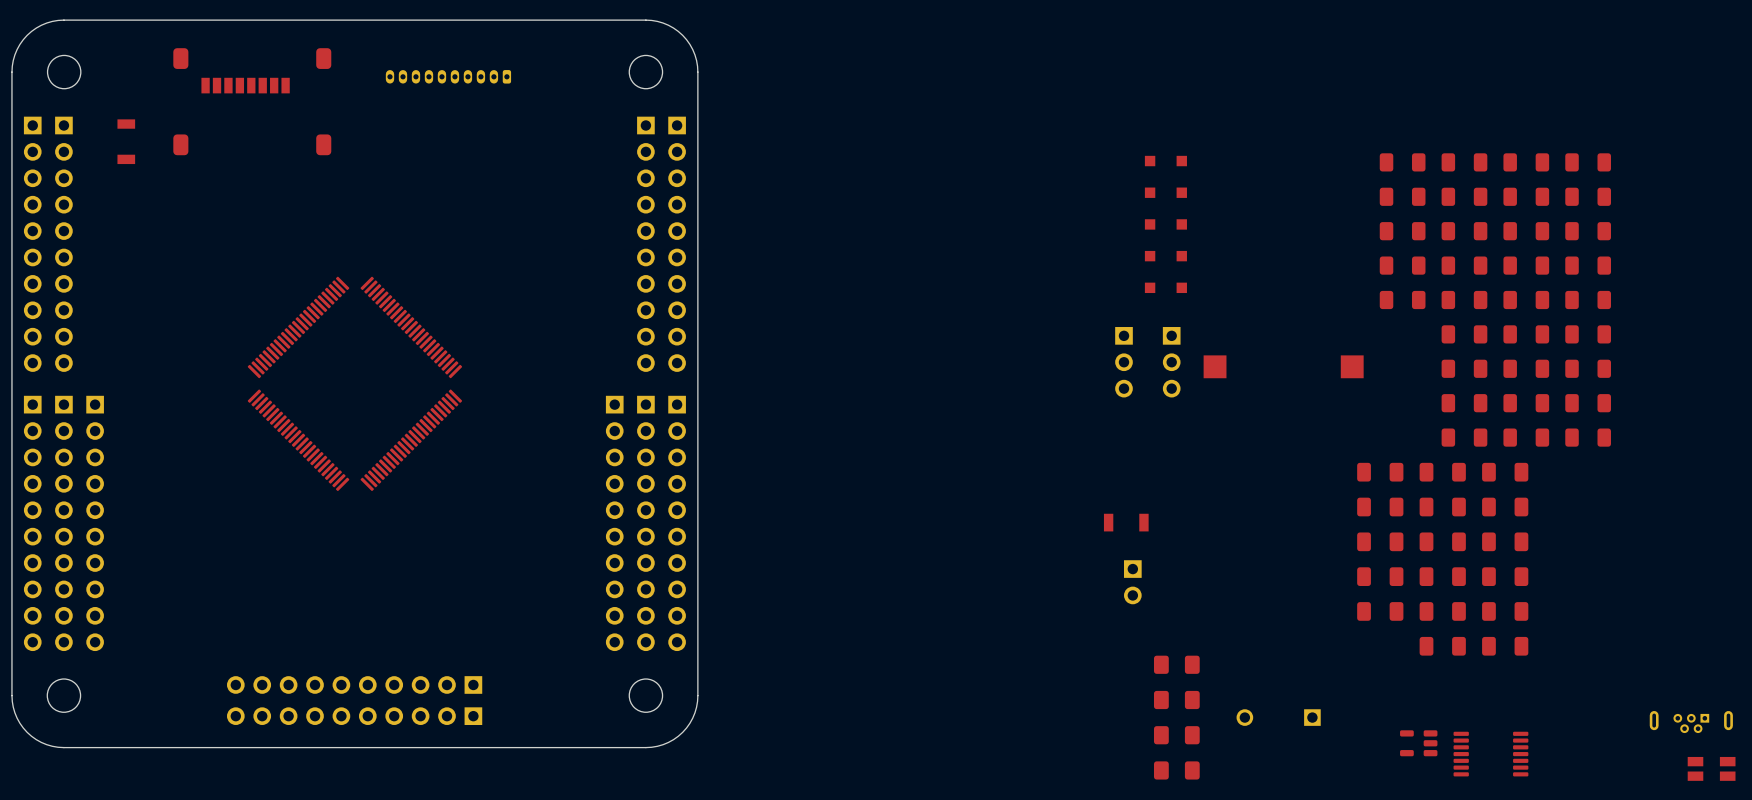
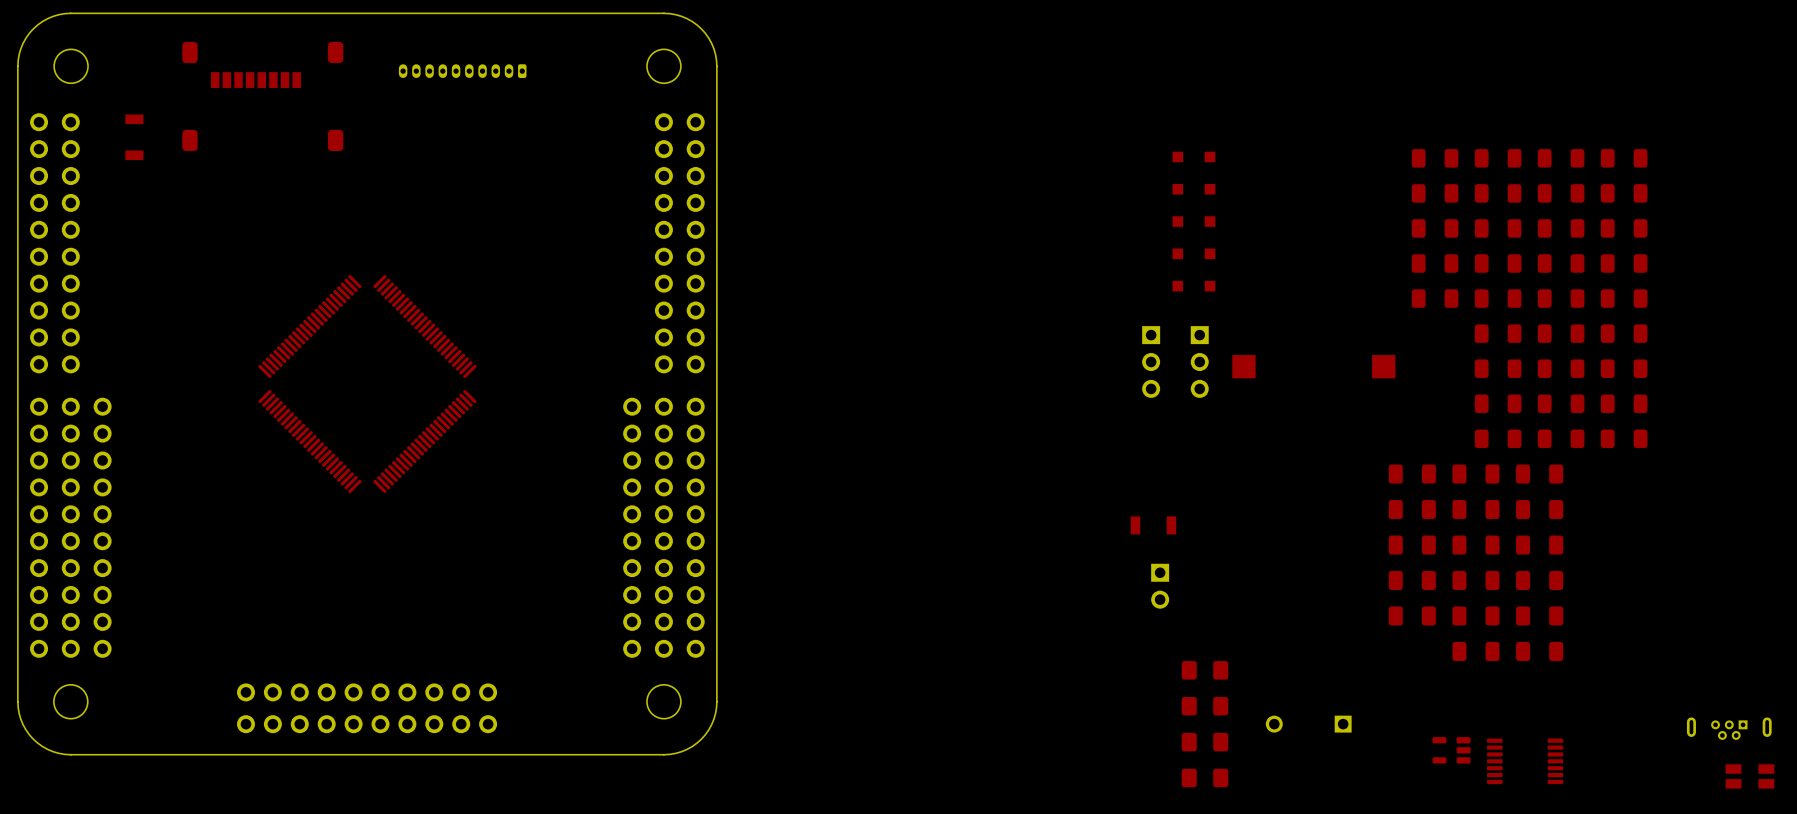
part: (32, 244) -> none
part: (63, 244) -> none
part: (645, 244) -> none
part: (677, 244) -> none
part: none -> (367, 384)
part: (32, 523) -> none
part: (63, 523) -> none
part: (95, 523) -> none
part: (614, 523) -> none
part: (645, 523) -> none
part: (677, 523) -> none
part: (354, 684) -> none
part: (354, 716) -> none

